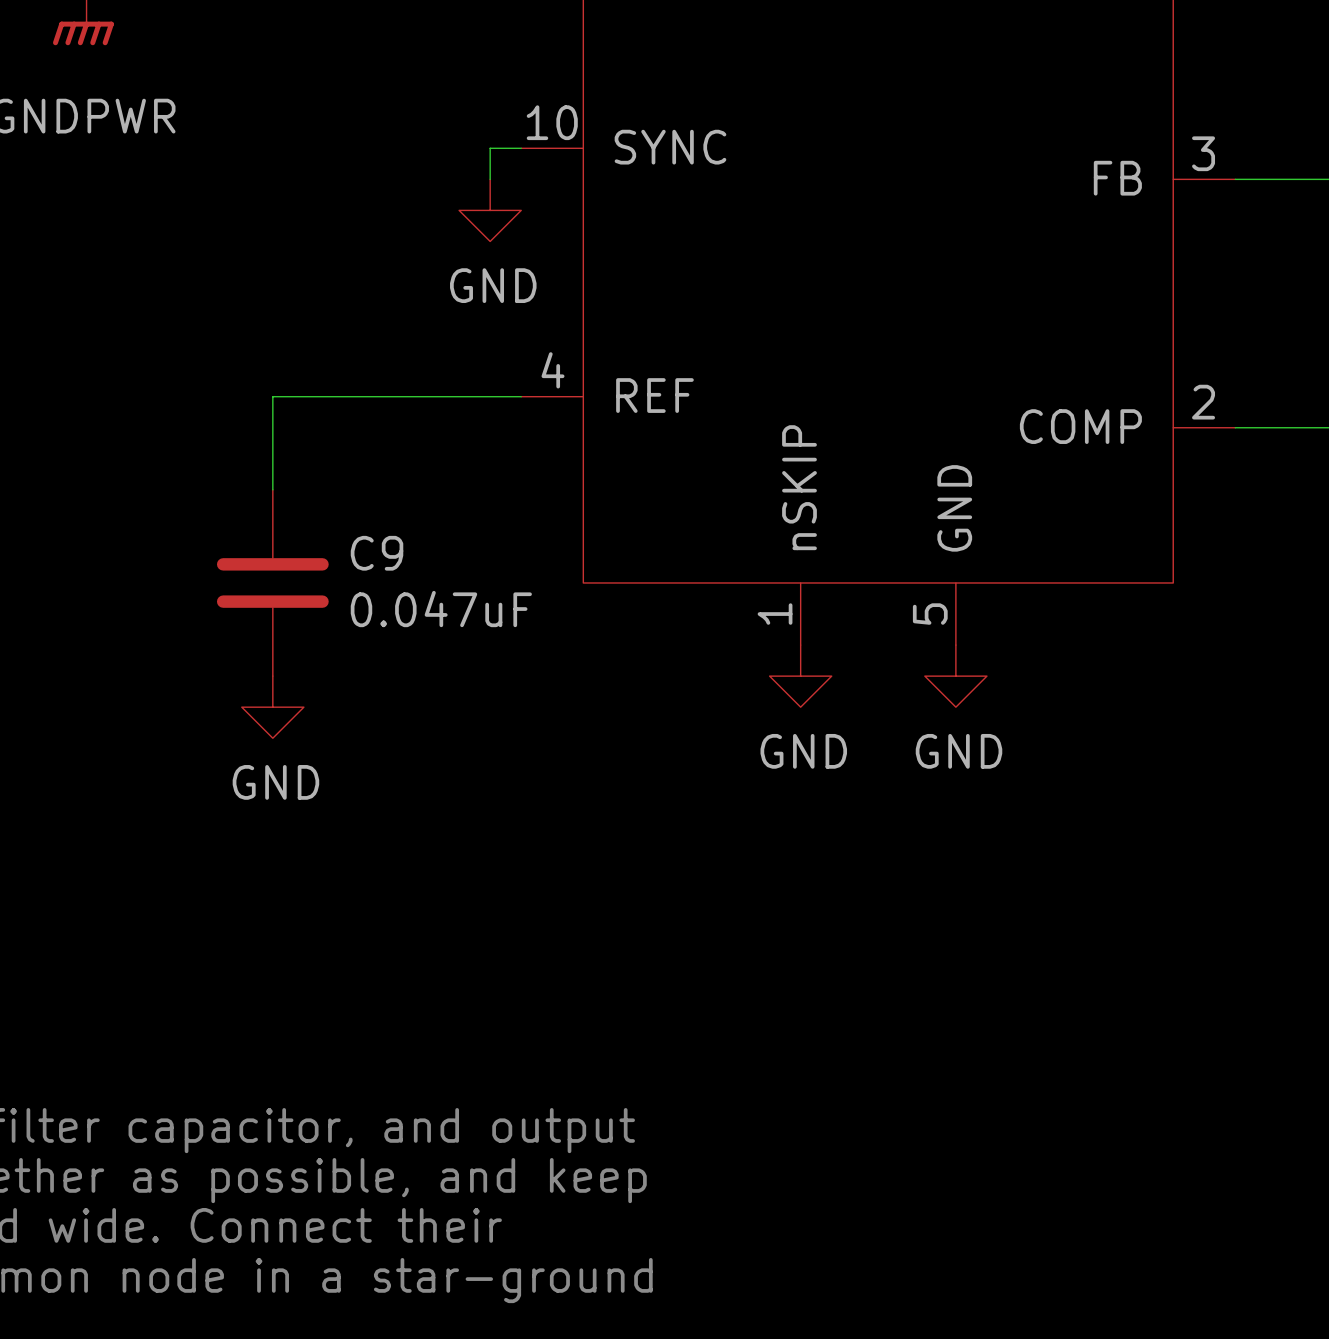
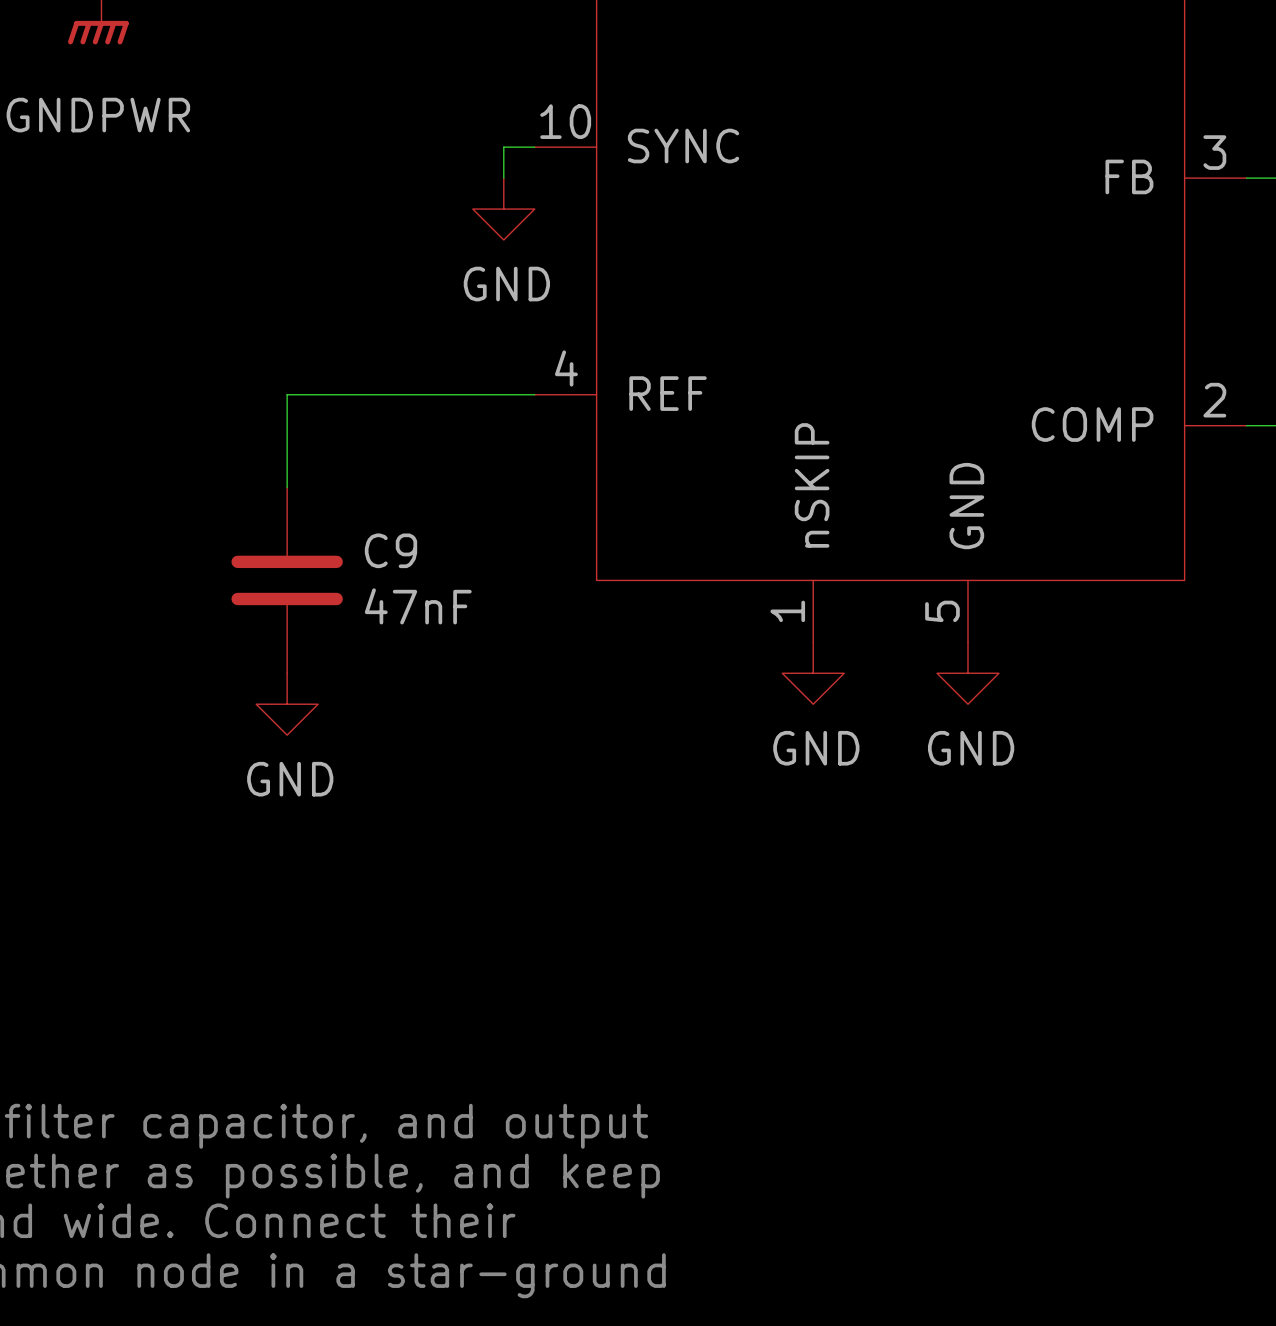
C9 value: 0.047uF (441, 609) -> 47nF (418, 606)

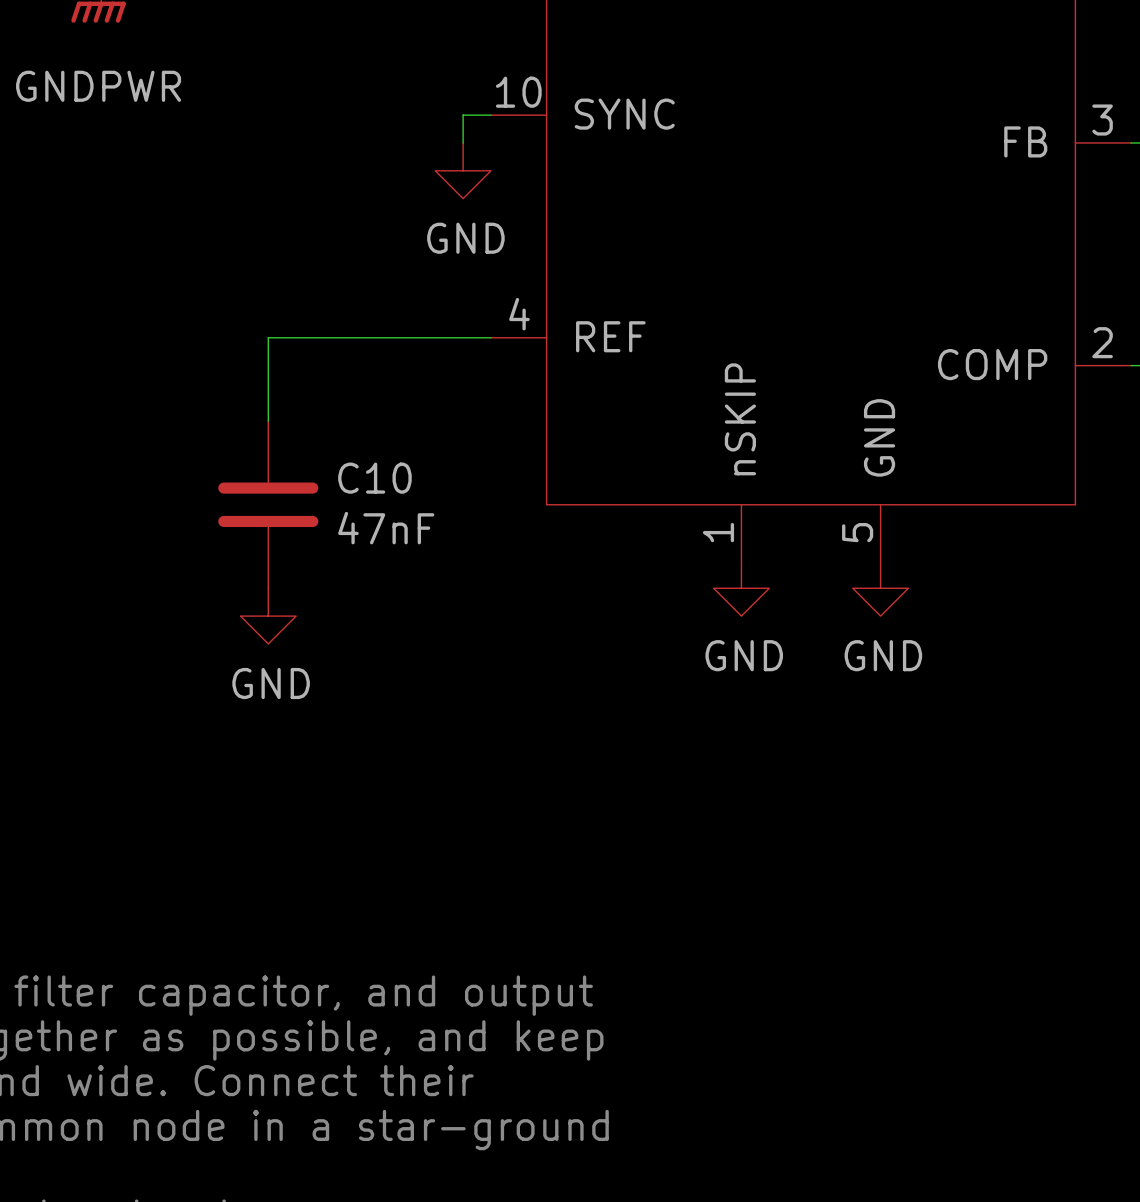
C9 name: C9 (390, 550) -> C10 (374, 478)

